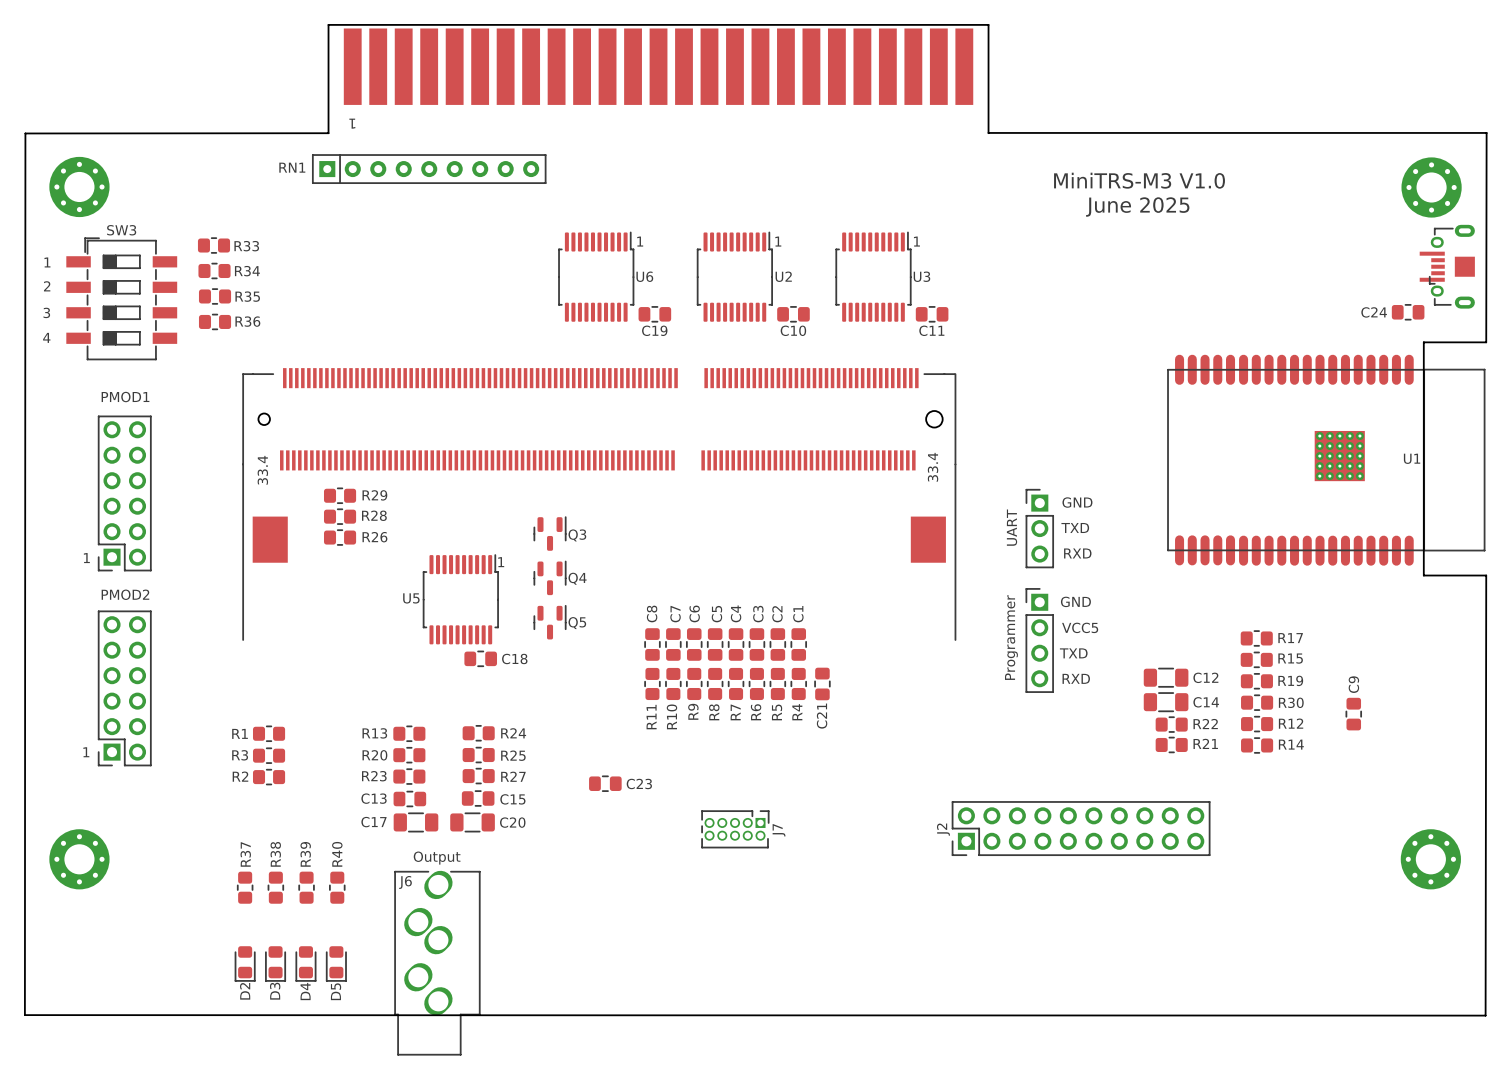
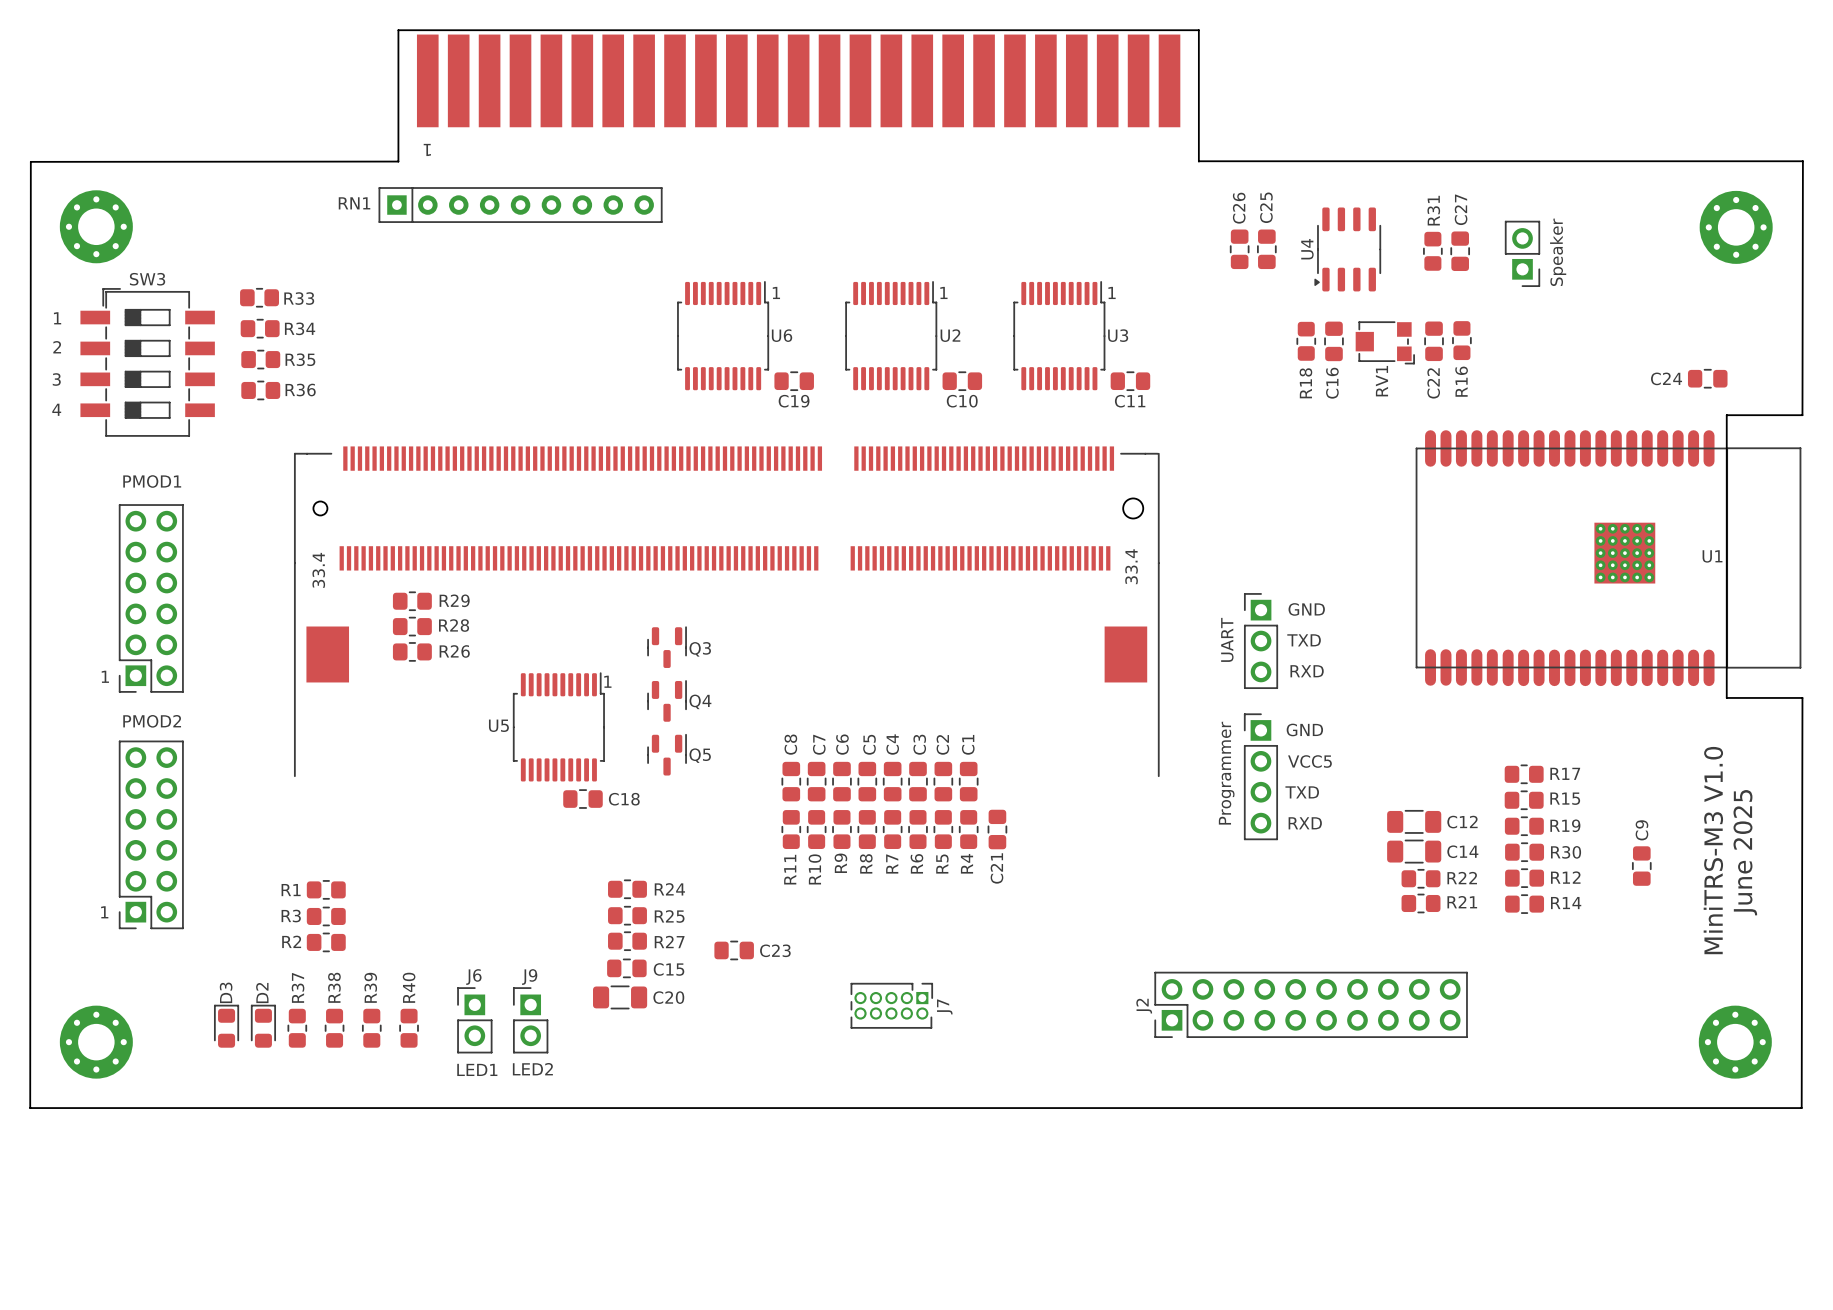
board edge: (25, 133) (24, 1015) (1485, 1015) (1486, 575) -> (30, 161) (30, 1108) (1801, 1108) (1802, 697)
text: MiniTRS-M3 V1.0 (1139, 180) -> none
C26: none -> (1239, 249)
C25: none -> (1266, 249)
U4: none -> (1347, 249)
text: June 2025 (1137, 207) -> none
R31: none -> (1432, 251)
C27: none -> (1460, 251)
text: none -> Speaker (1558, 252)
part: none -> (1522, 253)
part: (1447, 266) -> none
R16: none -> (1461, 340)
R18: none -> (1306, 341)
C16: none -> (1333, 341)
C22: none -> (1434, 341)
RV1: none -> (1385, 342)
text: none -> MiniTRS-M3 V1.0 (1713, 850)
text: none -> June 2025 (1745, 852)
R13: (409, 733) -> none
R24 position: (478, 733) -> (627, 889)
R20: (409, 755) -> none
R25 position: (478, 755) -> (627, 915)
R23: (409, 776) -> none
R27 position: (478, 776) -> (627, 941)
C15 position: (478, 798) -> (626, 968)
C13: (409, 799) -> none
C17: (415, 822) -> none
C20 position: (472, 822) -> (620, 997)
J9: none -> (530, 1020)
text: Output (437, 858) -> none
J6 footprint: [394, 870, 481, 1056] -> [457, 987, 493, 1054]
text: none -> LED2 (532, 1069)
text: none -> LED1 (477, 1069)
J6 name position: J6 (405, 882) -> J6 (473, 977)
R37 position: (245, 887) -> (297, 1028)
R38 position: (275, 887) -> (334, 1028)
R39 position: (306, 887) -> (371, 1028)
R40 position: (337, 887) -> (409, 1028)
D2 rotation: 0° (245, 963) -> 180° (263, 1026)
D2 position: (245, 963) -> (263, 1026)
D3 rotation: 0° (275, 963) -> 180° (226, 1026)
D3 position: (275, 963) -> (226, 1026)
D4: (305, 963) -> none
D5: (336, 963) -> none

